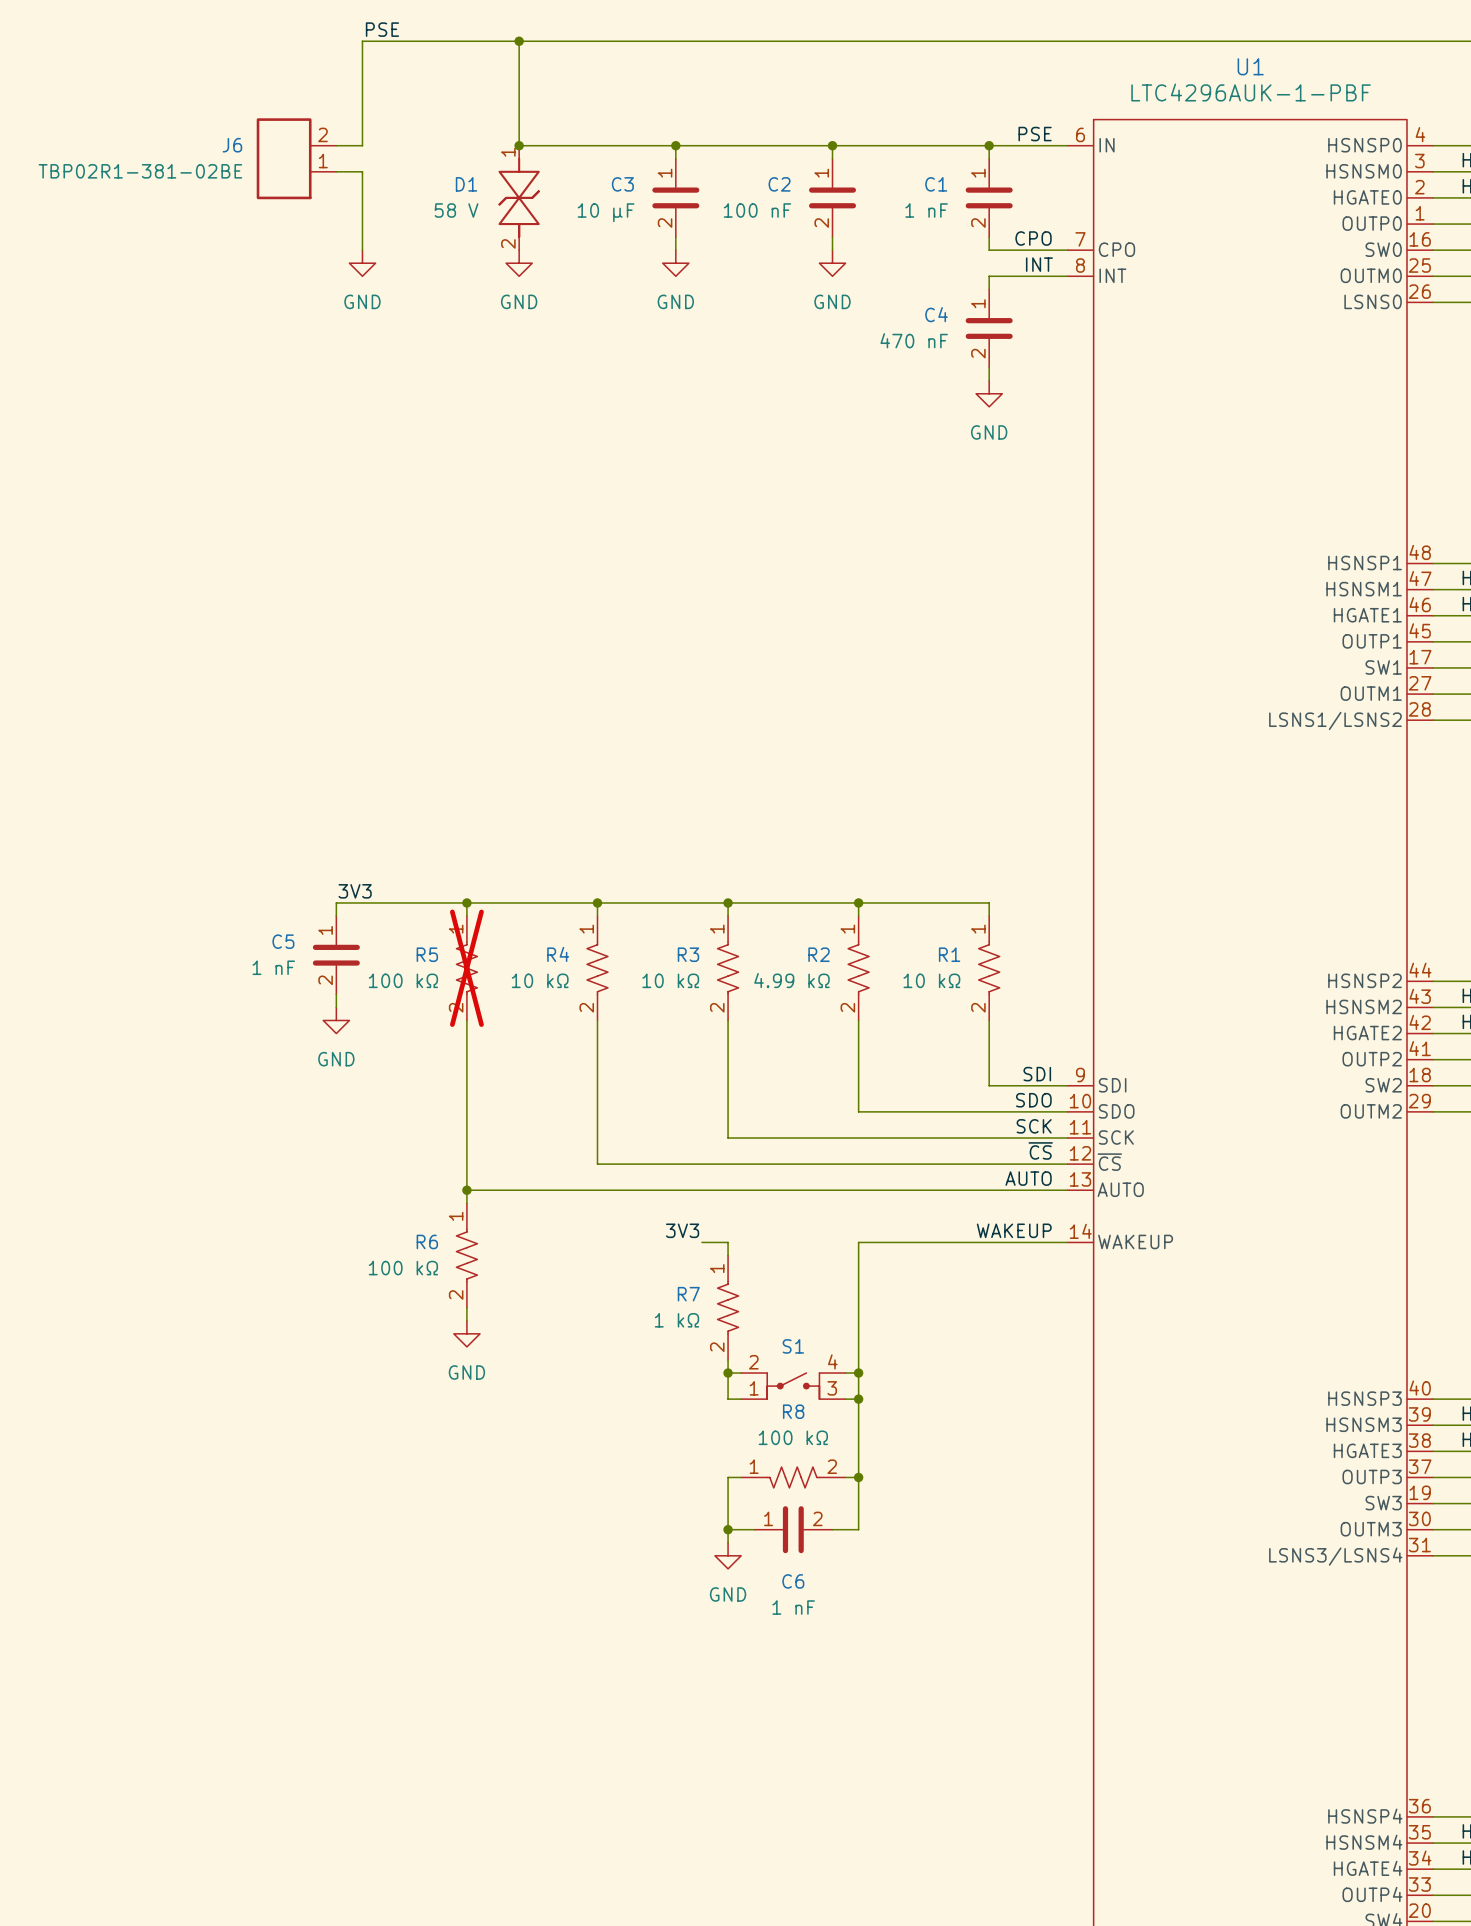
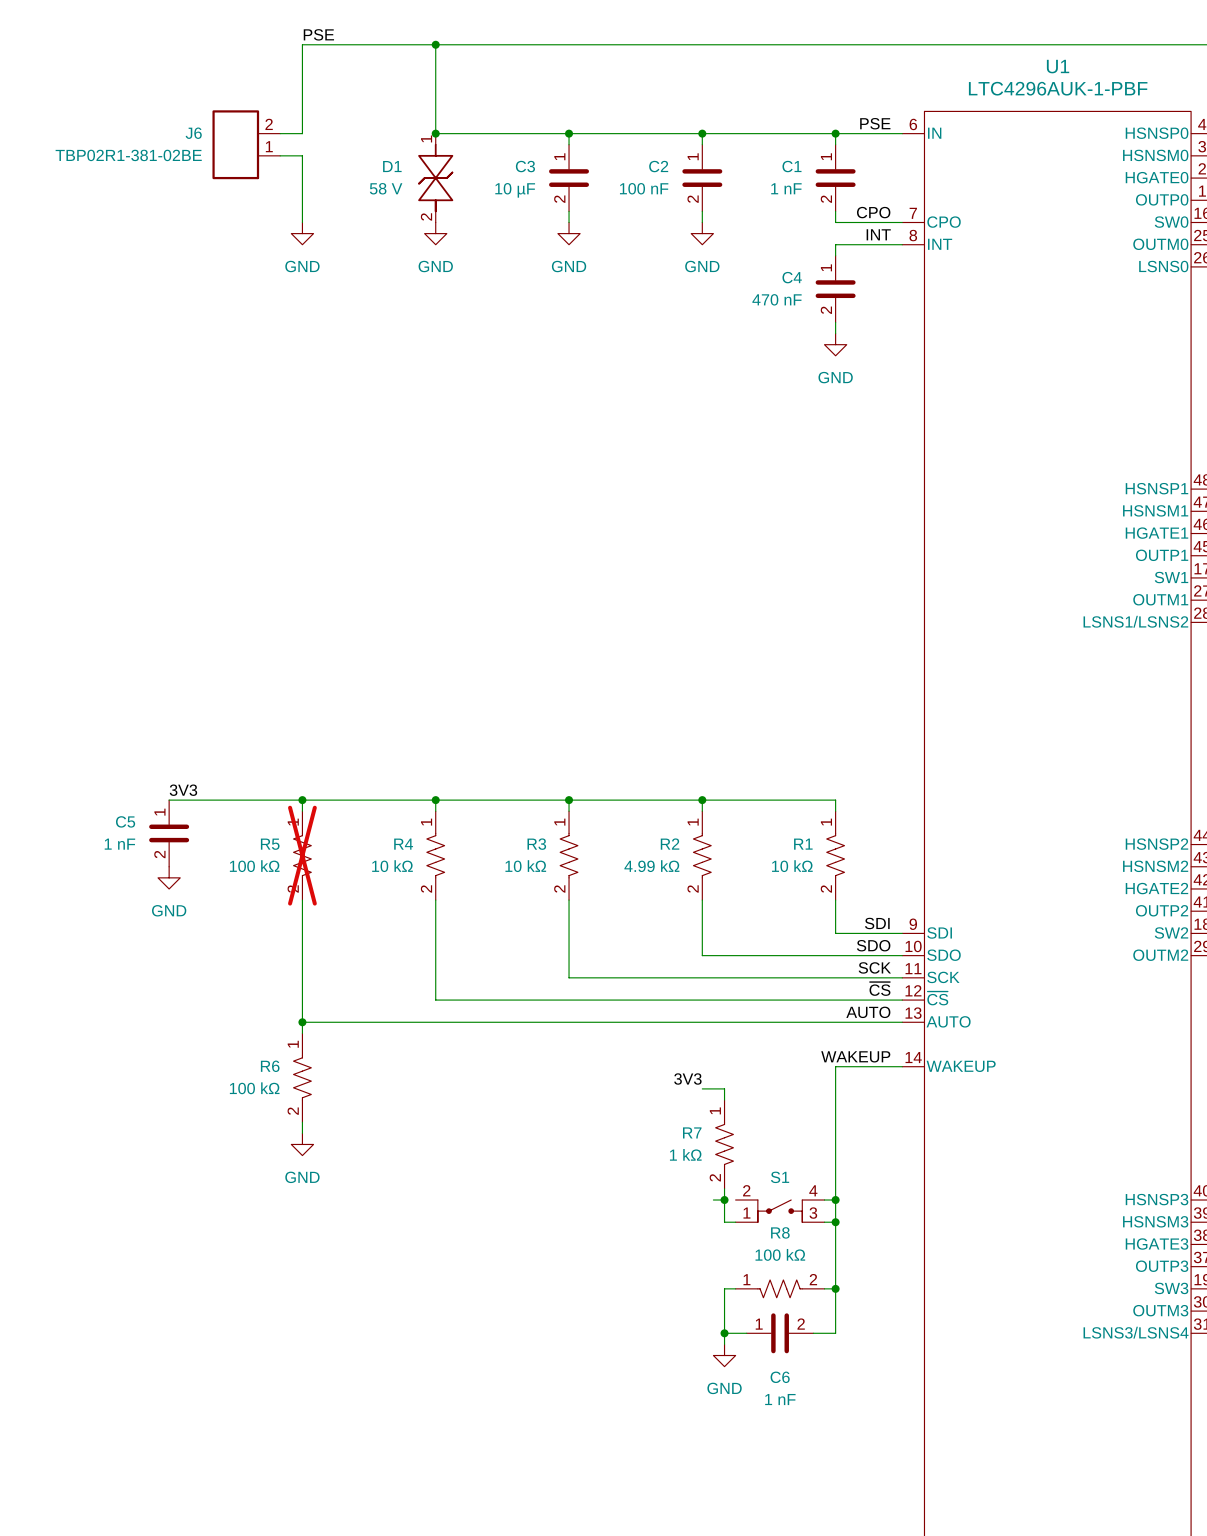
label position: 3V3 (355, 891) -> 3V3 (183, 790)
wire: (466, 902) (466, 916) -> (435, 800) (435, 811)
junction: (466, 902) -> none
wire: (597, 902) (597, 916) -> none
junction: (597, 902) -> none
wire: (728, 902) (728, 916) -> (569, 800) (569, 811)
junction: (728, 902) -> none
wire: (858, 902) (858, 916) -> (702, 800) (702, 811)
junction position: (858, 902) -> (702, 800)
wire: (336, 916) (336, 902) (989, 902) (989, 916) -> none
wire: none -> (169, 800) (835, 800) (835, 811)
junction: none -> (302, 800)
junction: none -> (435, 800)
junction: none -> (569, 800)
C5 position: (336, 955) -> (169, 833)
R5 position: (466, 968) -> (302, 855)
R4 position: (597, 968) -> (435, 855)
R3 position: (728, 968) -> (569, 855)
R2 position: (858, 968) -> (702, 855)
R1 position: (989, 968) -> (835, 855)
wire: (336, 994) (336, 1007) -> (302, 800) (302, 811)
power symbol position: GND (336, 1020) -> GND (169, 877)
wire: (466, 1020) (466, 1203) -> none
wire: (597, 1020) (597, 1164) -> (435, 900) (435, 1000) (502, 1000)
wire: (728, 1020) (728, 1138) -> (569, 900) (569, 977) (613, 977)
wire: (858, 1020) (858, 1111) -> (702, 900) (702, 955) (724, 955)
wire: none -> (302, 900) (302, 1033)
wire: none -> (302, 1022) (391, 1022)
junction: none -> (302, 1022)
junction: (466, 1190) -> none
label position: 3V3 (682, 1230) -> 3V3 (687, 1079)
wire: (701, 1242) (728, 1242) (728, 1255) -> none
wire: (989, 1242) (858, 1242) (858, 1268) -> (702, 1088) (724, 1088)
wire: none -> (835, 1066) (835, 1333) (813, 1333)
R6 position: (466, 1255) -> (302, 1077)
wire: (466, 1307) (466, 1320) -> (302, 1122) (302, 1133)
R7 position: (728, 1307) -> (724, 1144)
power symbol position: GND (466, 1333) -> GND (302, 1144)
wire: (728, 1359) (728, 1399) (741, 1399) -> none
wire: (728, 1373) (741, 1373) -> (724, 1288) (735, 1288)
junction: (728, 1373) -> none
wire: (845, 1373) (858, 1373) -> (824, 1200) (835, 1200)
junction: (858, 1373) -> none
S1 position: (793, 1386) -> (780, 1211)
junction: none -> (835, 1200)
wire: (858, 1425) (858, 1503) -> (724, 1222) (735, 1222)
wire: none -> (824, 1222) (835, 1222)
junction: none -> (835, 1222)
wire: (741, 1477) (728, 1477) (728, 1542) -> none
R8 position: (793, 1477) -> (780, 1288)
wire: (845, 1477) (858, 1477) -> (824, 1288) (835, 1288)
junction: (858, 1477) -> none
junction: none -> (835, 1288)
wire: (728, 1529) (754, 1529) -> (724, 1333) (746, 1333)
junction: (728, 1529) -> none
C6 position: (793, 1529) -> (780, 1333)
wire: (832, 1529) (858, 1529) -> (724, 1344) (724, 1311)
power symbol position: GND (728, 1555) -> GND (724, 1355)
junction: none -> (724, 1333)

